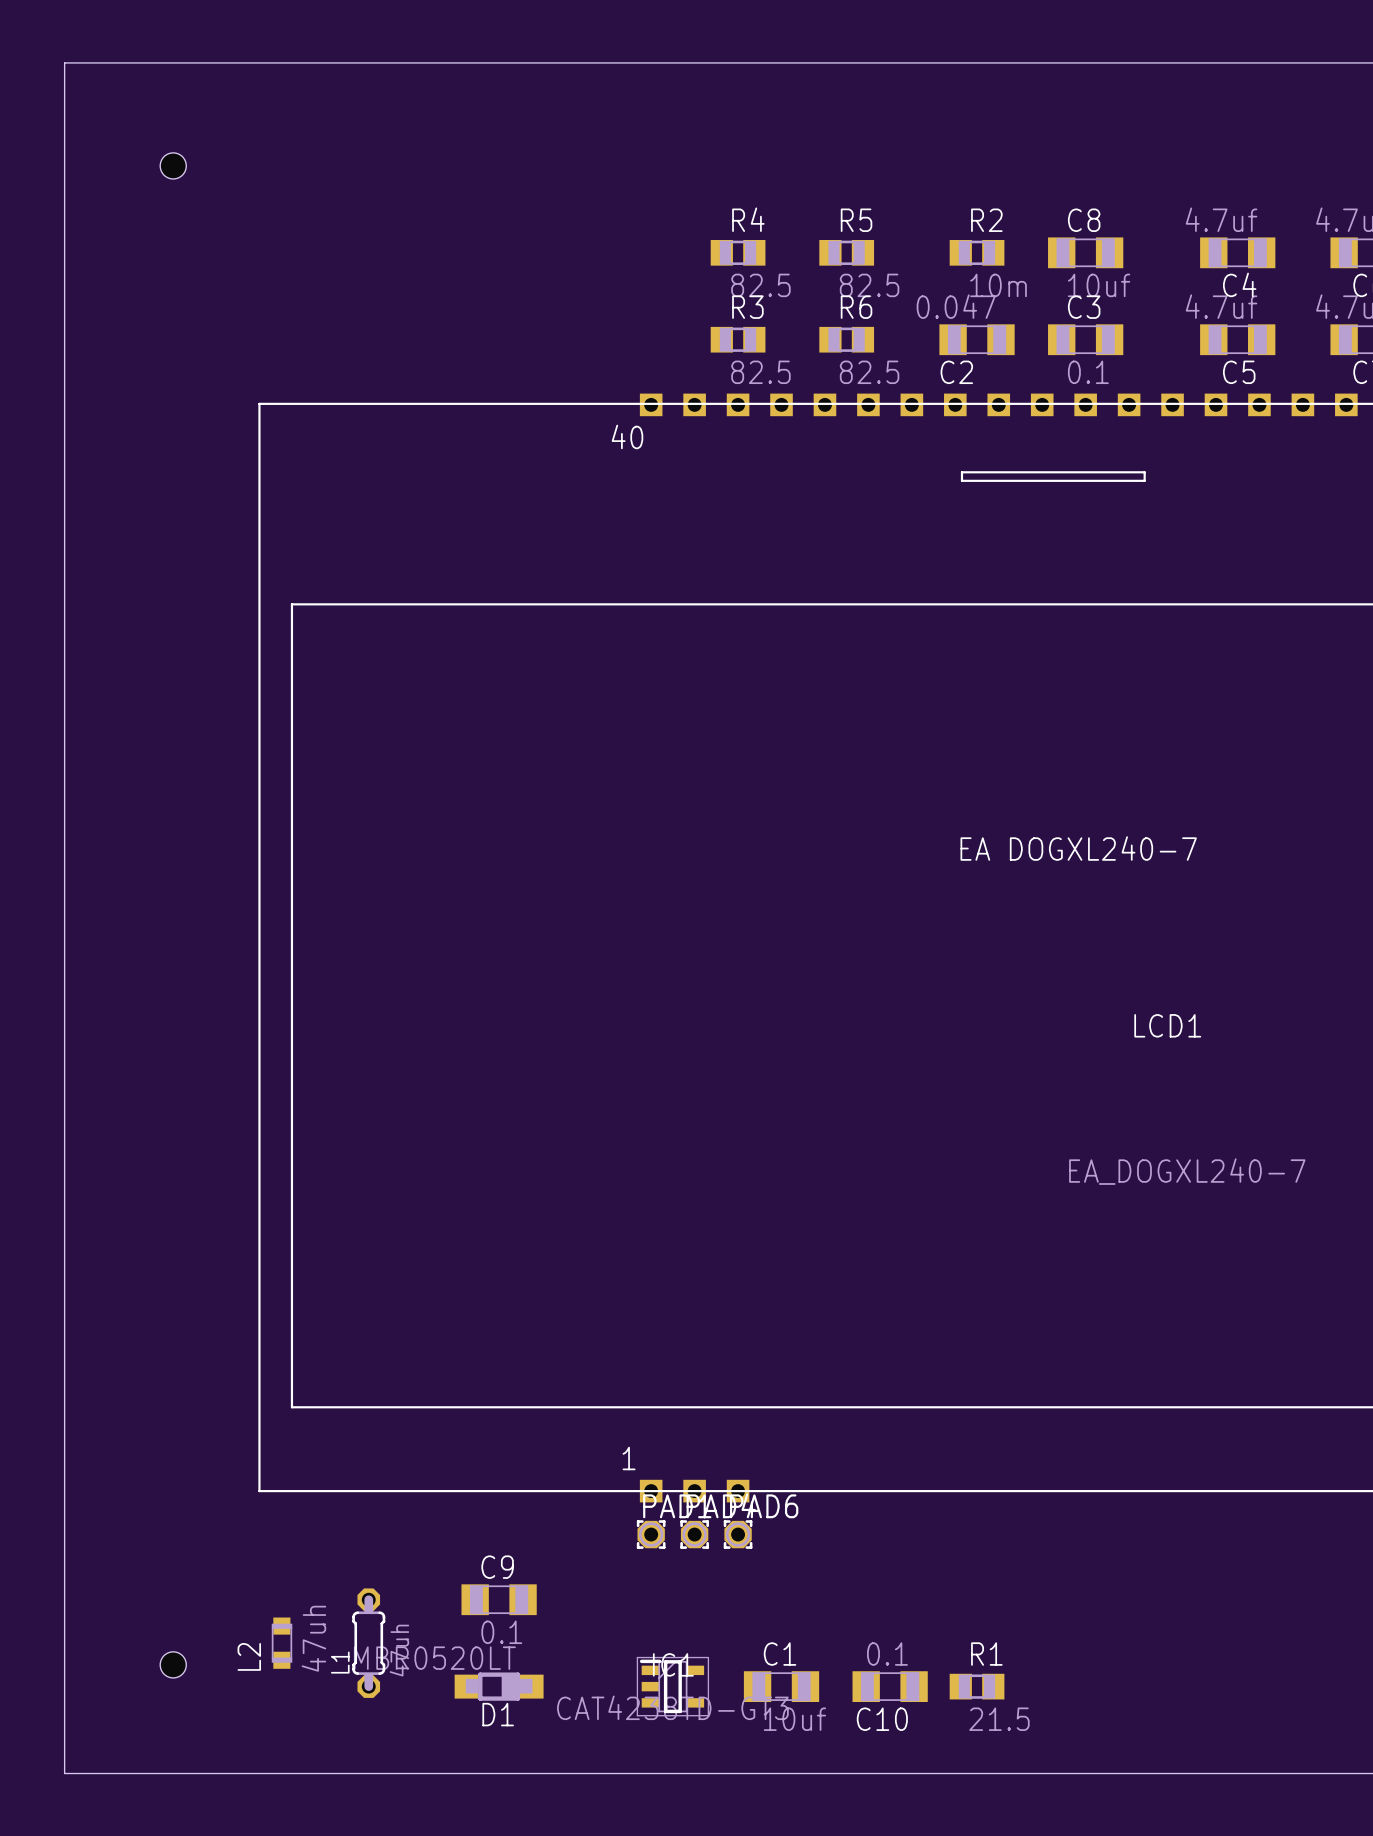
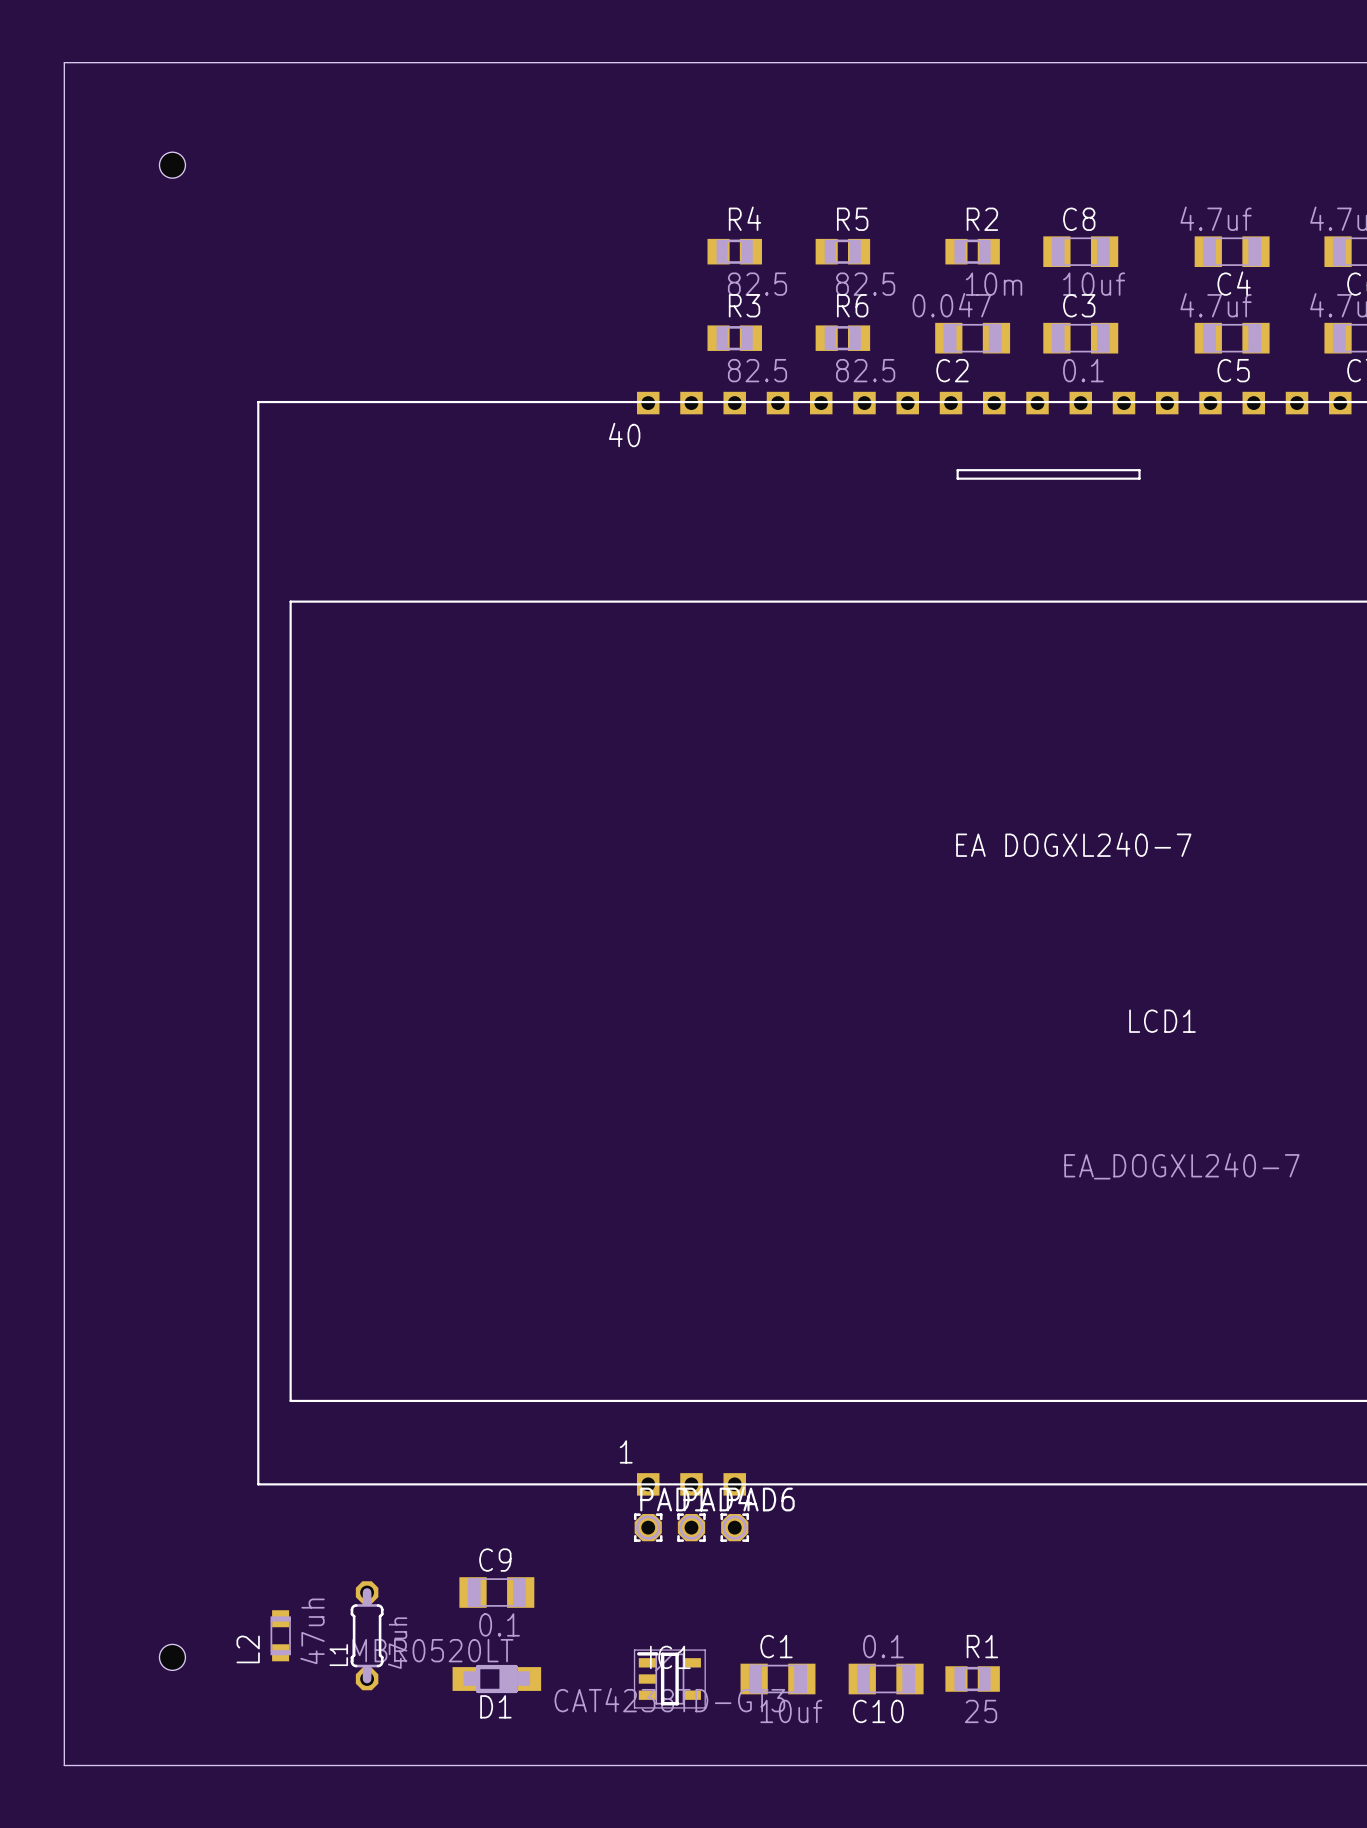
R1 value: 21.5 (999, 1719) -> 25 (981, 1711)

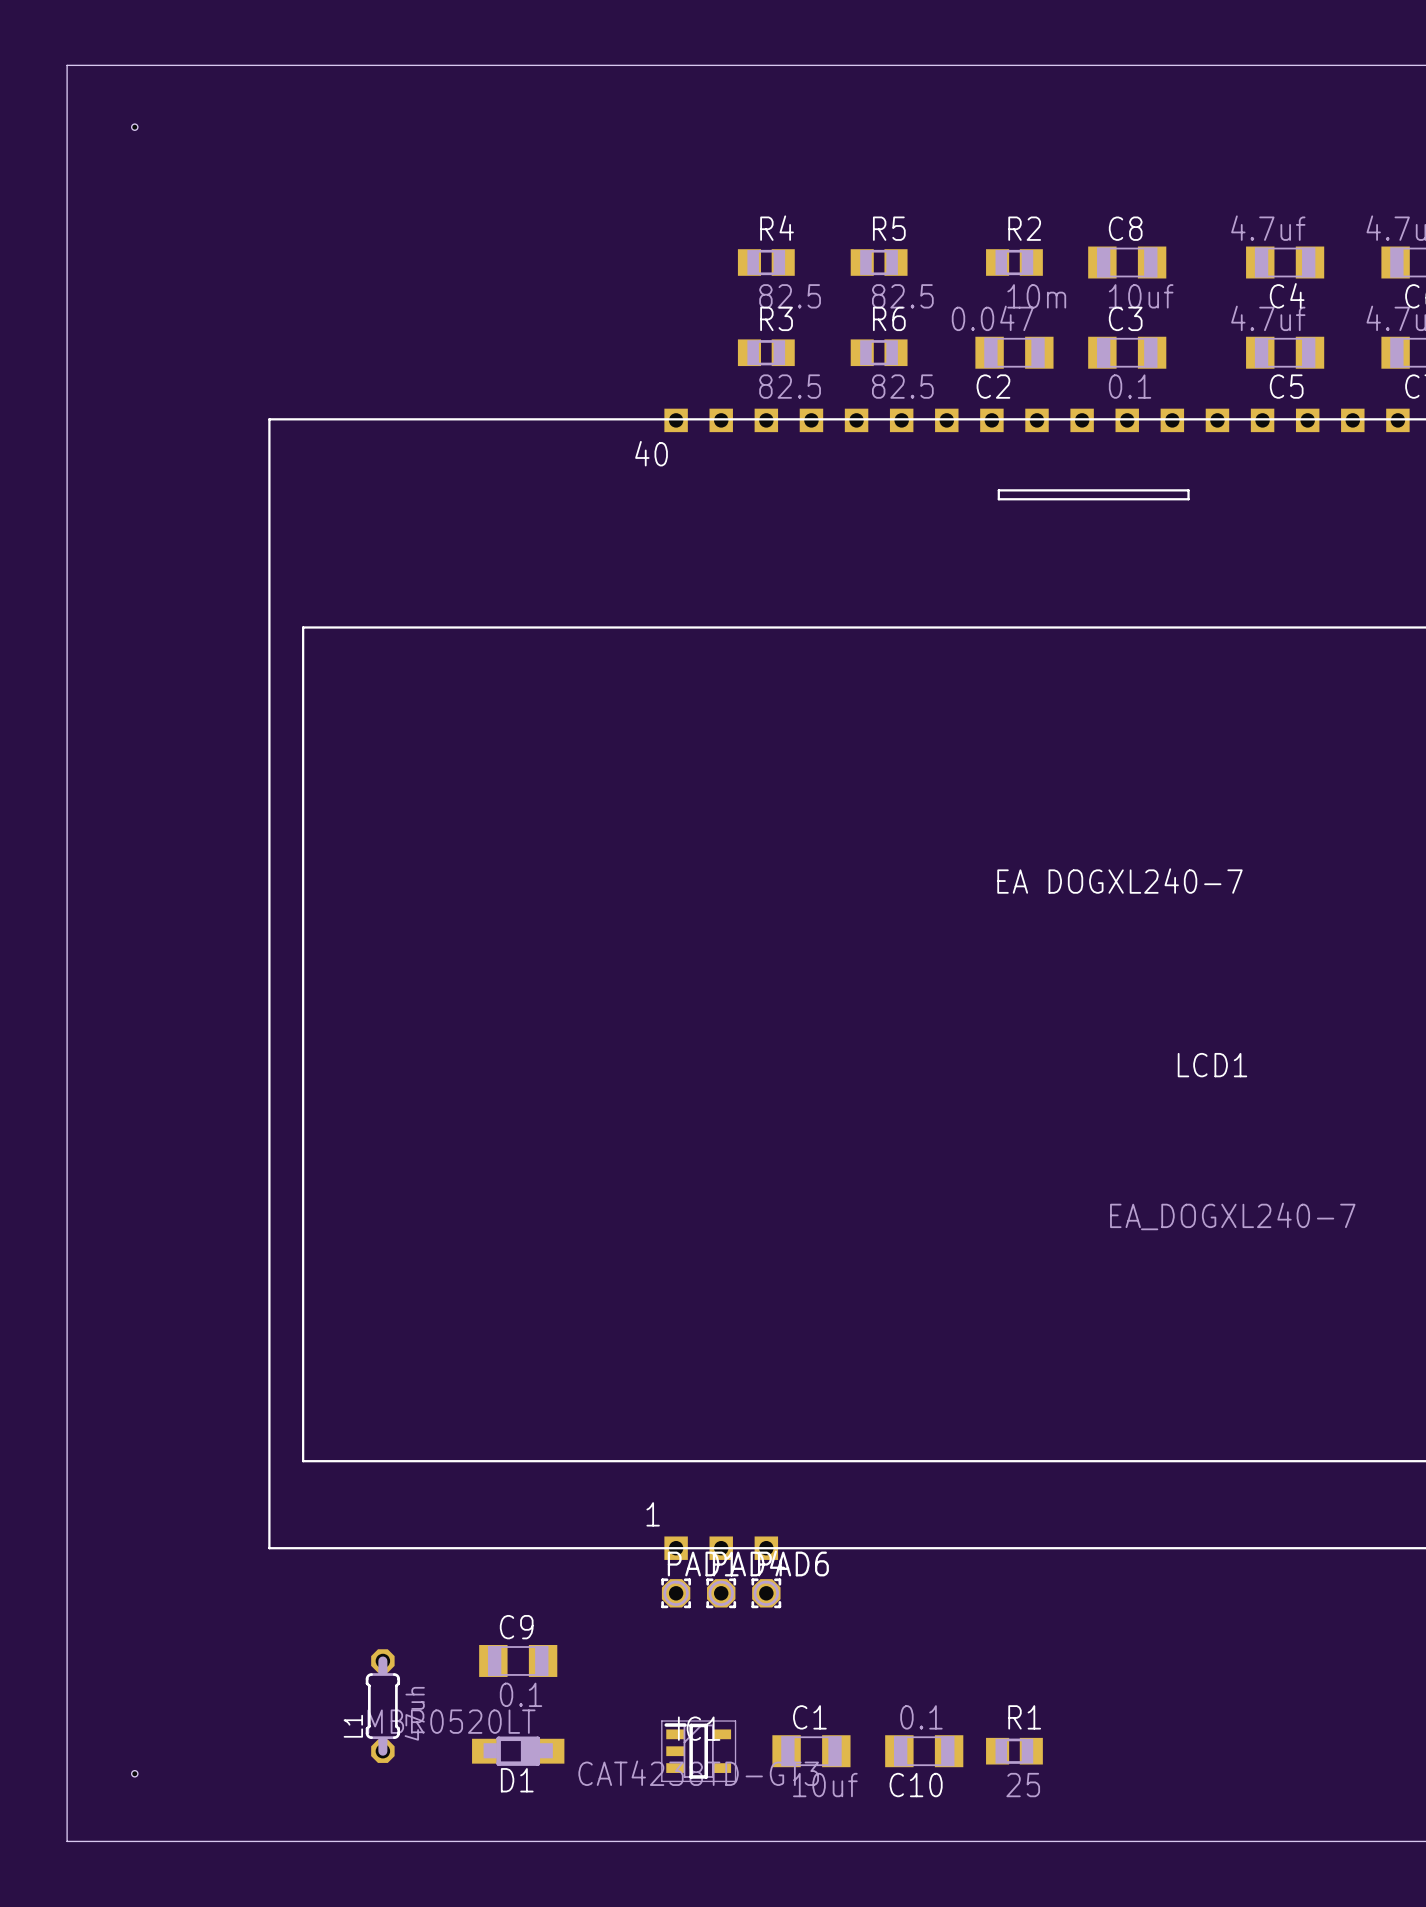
hole: none -> (134, 127)
hole: (172, 165) -> none
L2: 47uh (280, 1635) -> none
hole: (172, 1657) -> none
hole: none -> (134, 1773)

